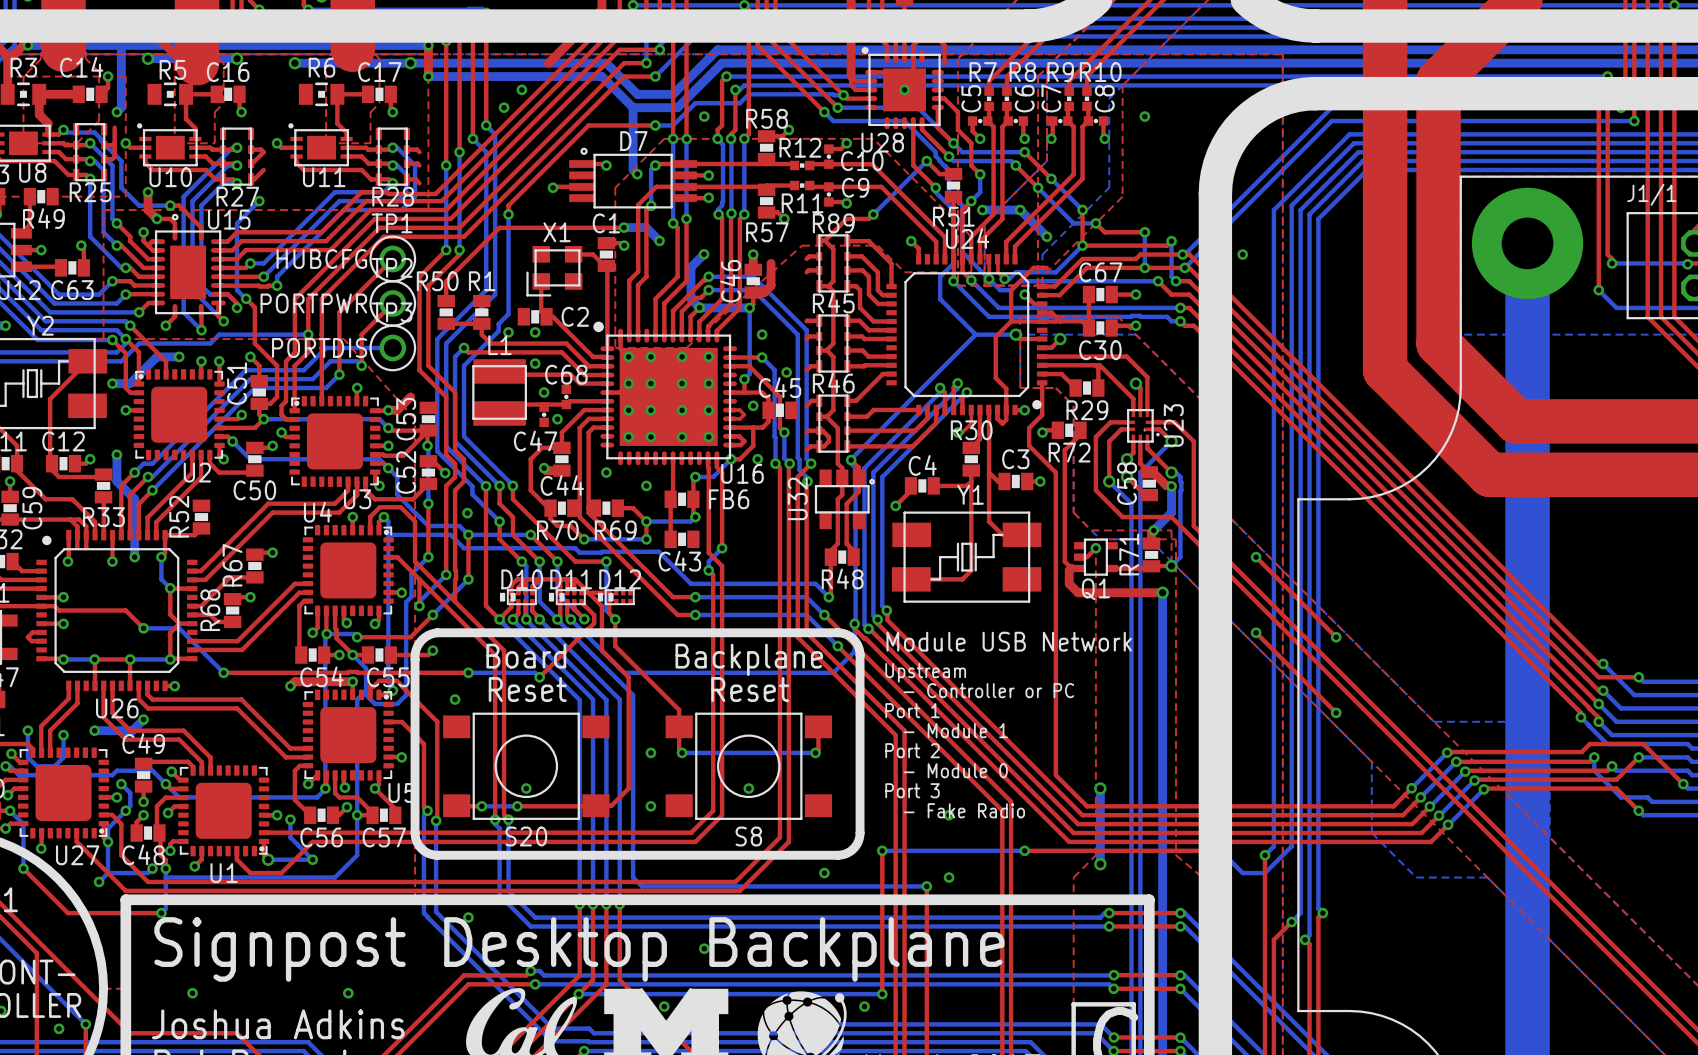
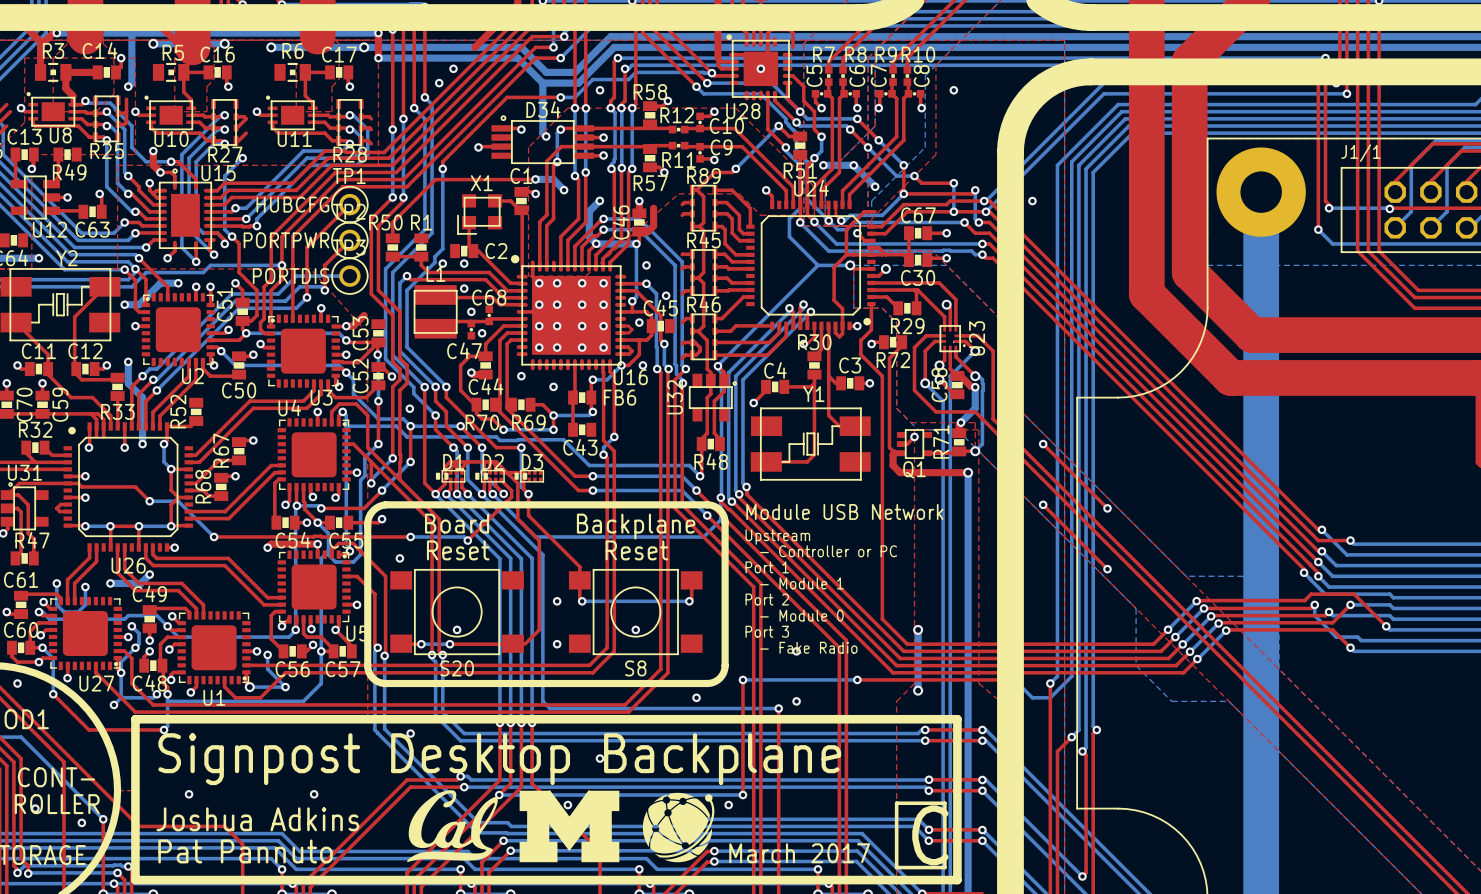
D7 name: D7 (633, 141) -> D34 (543, 109)
D10 name: D10 (522, 579) -> D1 (453, 461)
D11 name: D11 (571, 579) -> D2 (493, 461)
D12 name: D12 (620, 579) -> D3 (532, 461)

